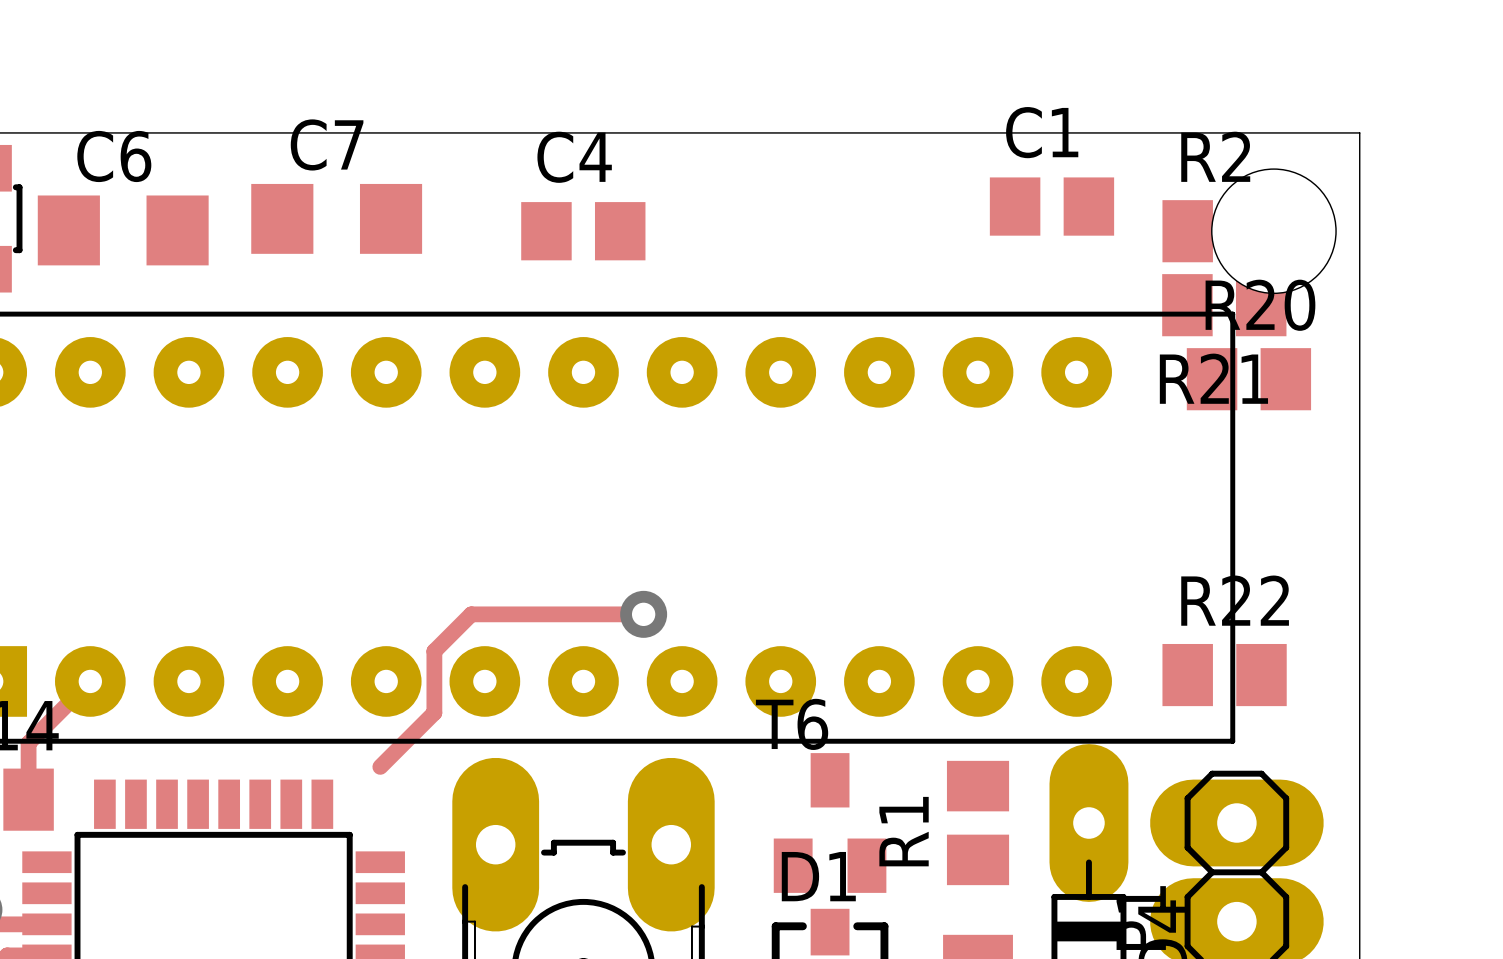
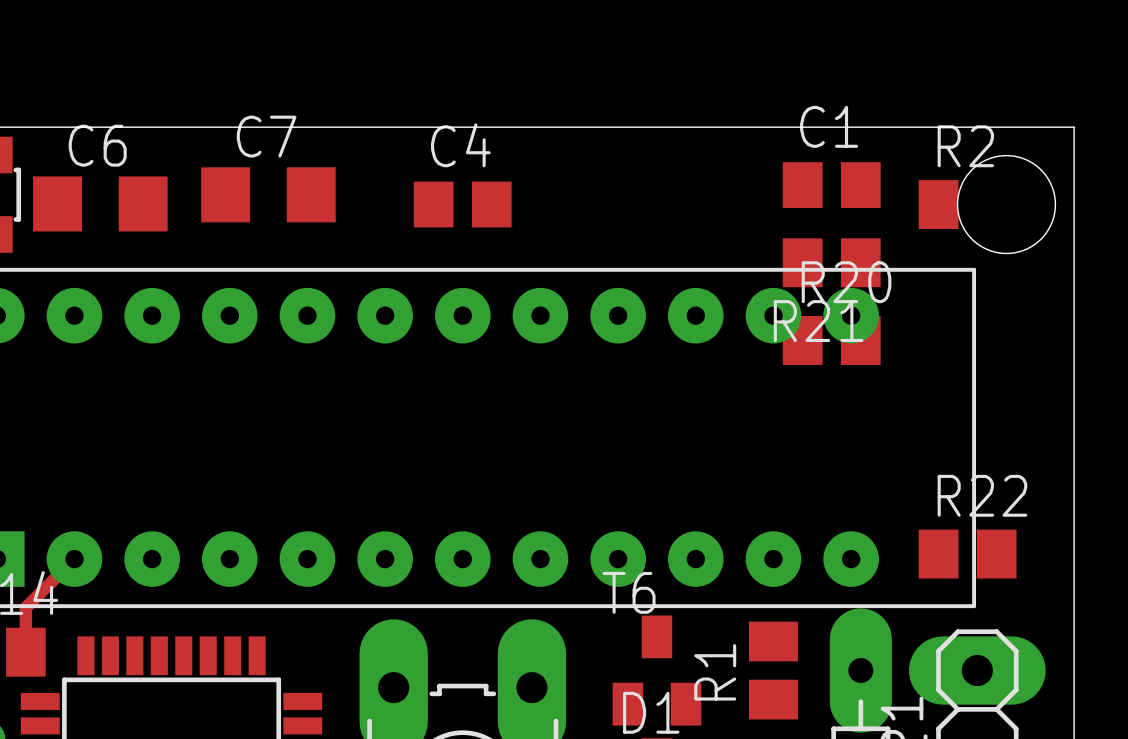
R21 position: (1224, 305) -> (831, 262)
R20 position: (1248, 379) -> (831, 340)
track: (643, 614) (471, 614) (434, 651) (434, 712) (380, 766) -> none
via: (643, 614) -> none

